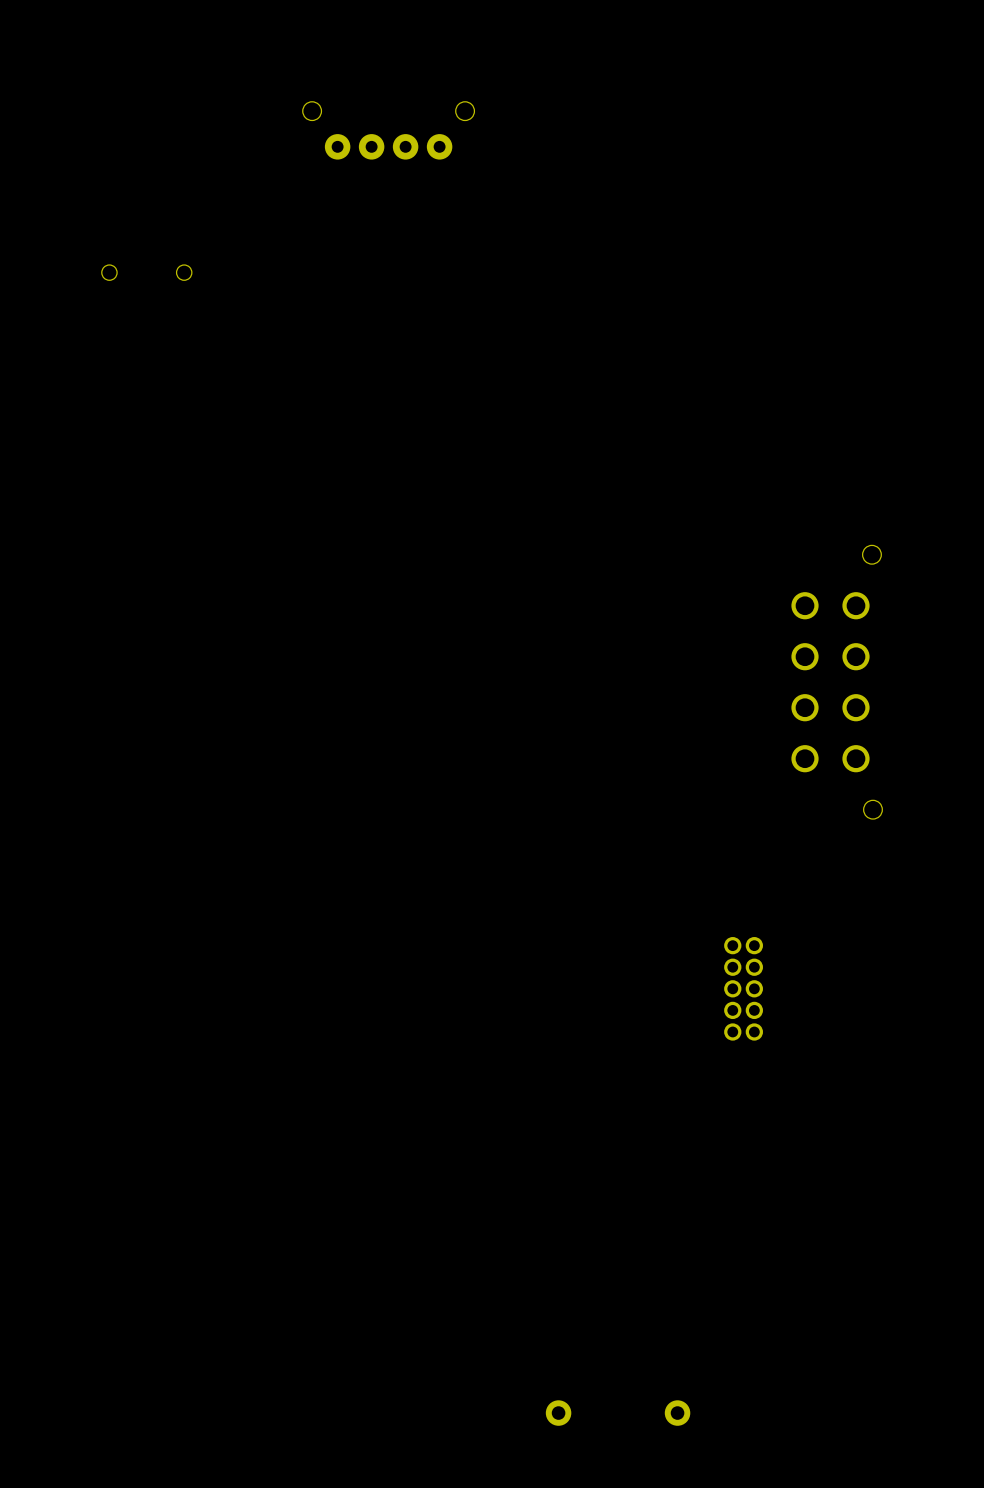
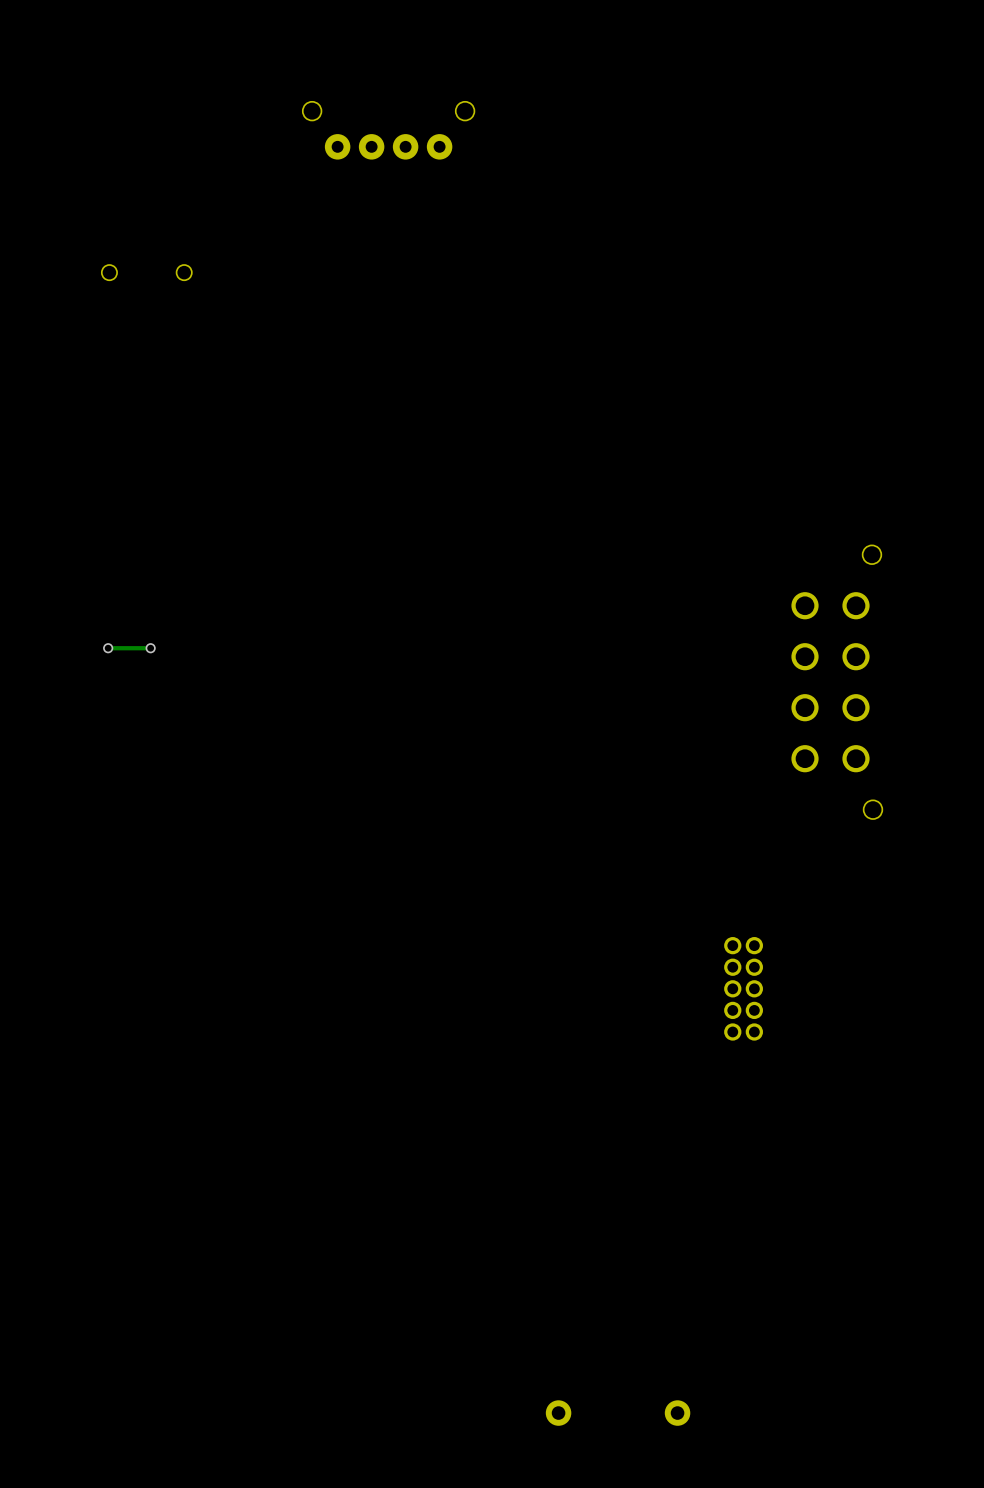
via: none -> (108, 648)
track: none -> (150, 648) (108, 648)
via: none -> (150, 648)

